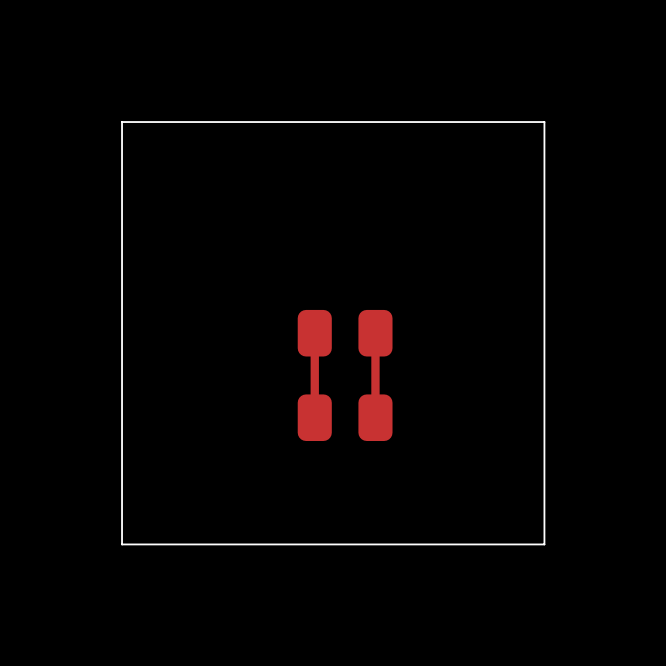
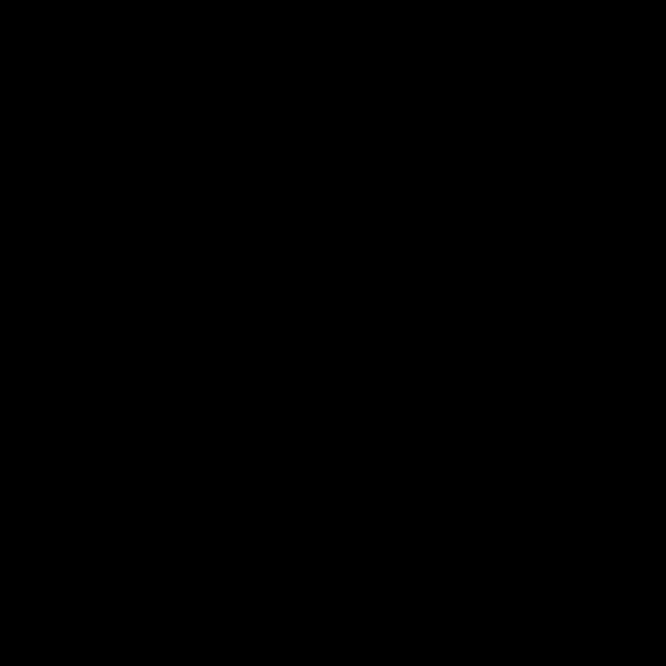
board edge: (544, 122) (122, 122) (122, 544) (544, 544) (544, 122) -> none
top track: (314, 333) (314, 417) -> none
part: (345, 333) -> none
top track: (375, 333) (375, 417) -> none
part: (345, 417) -> none

